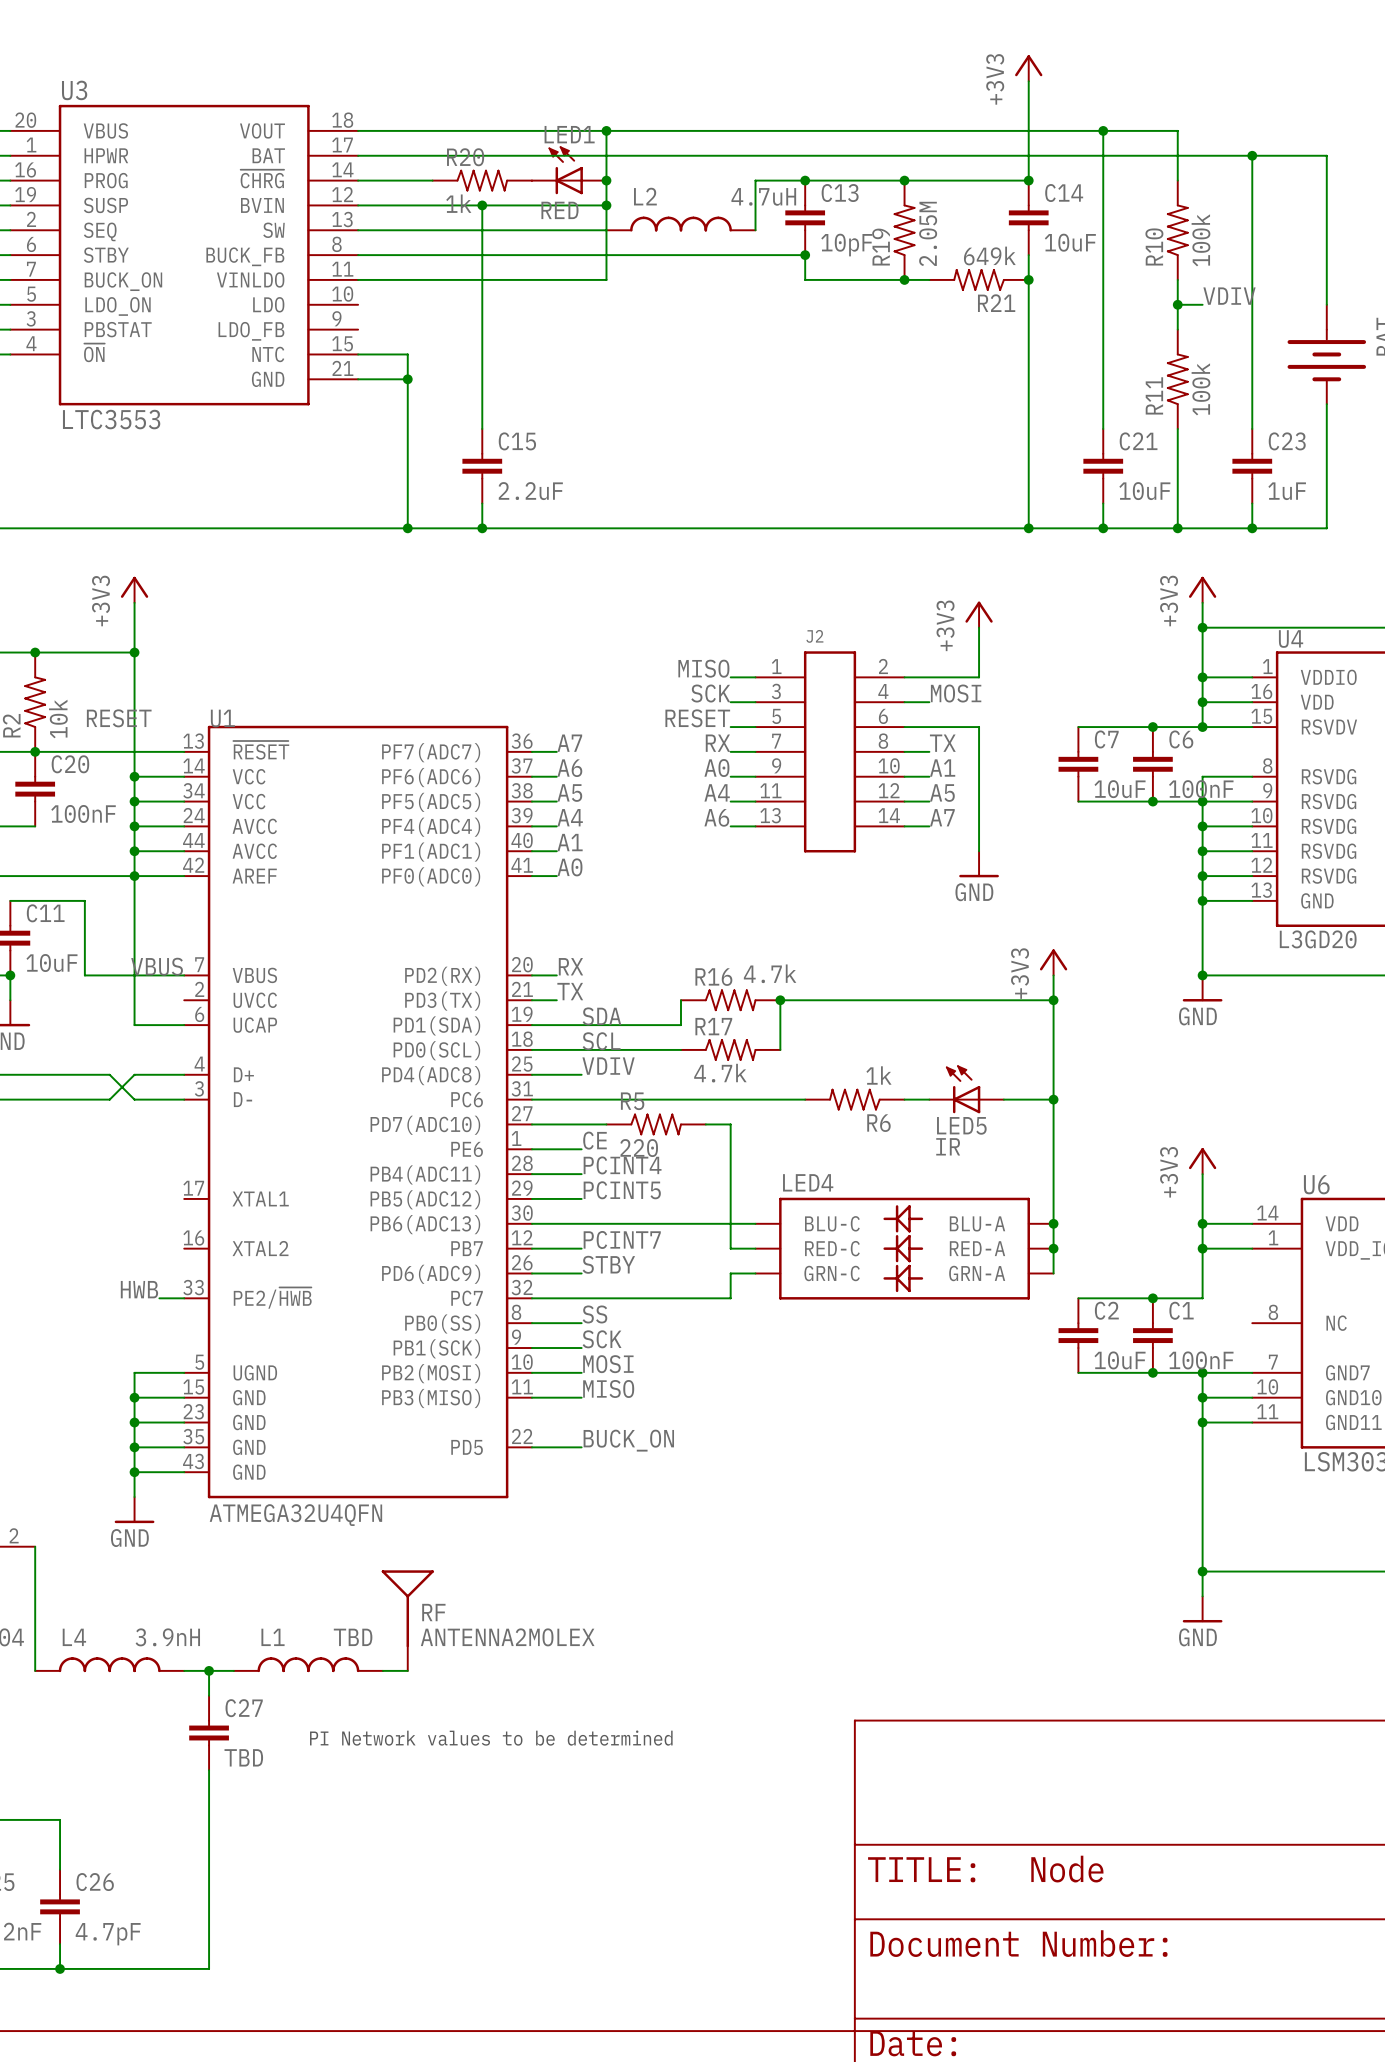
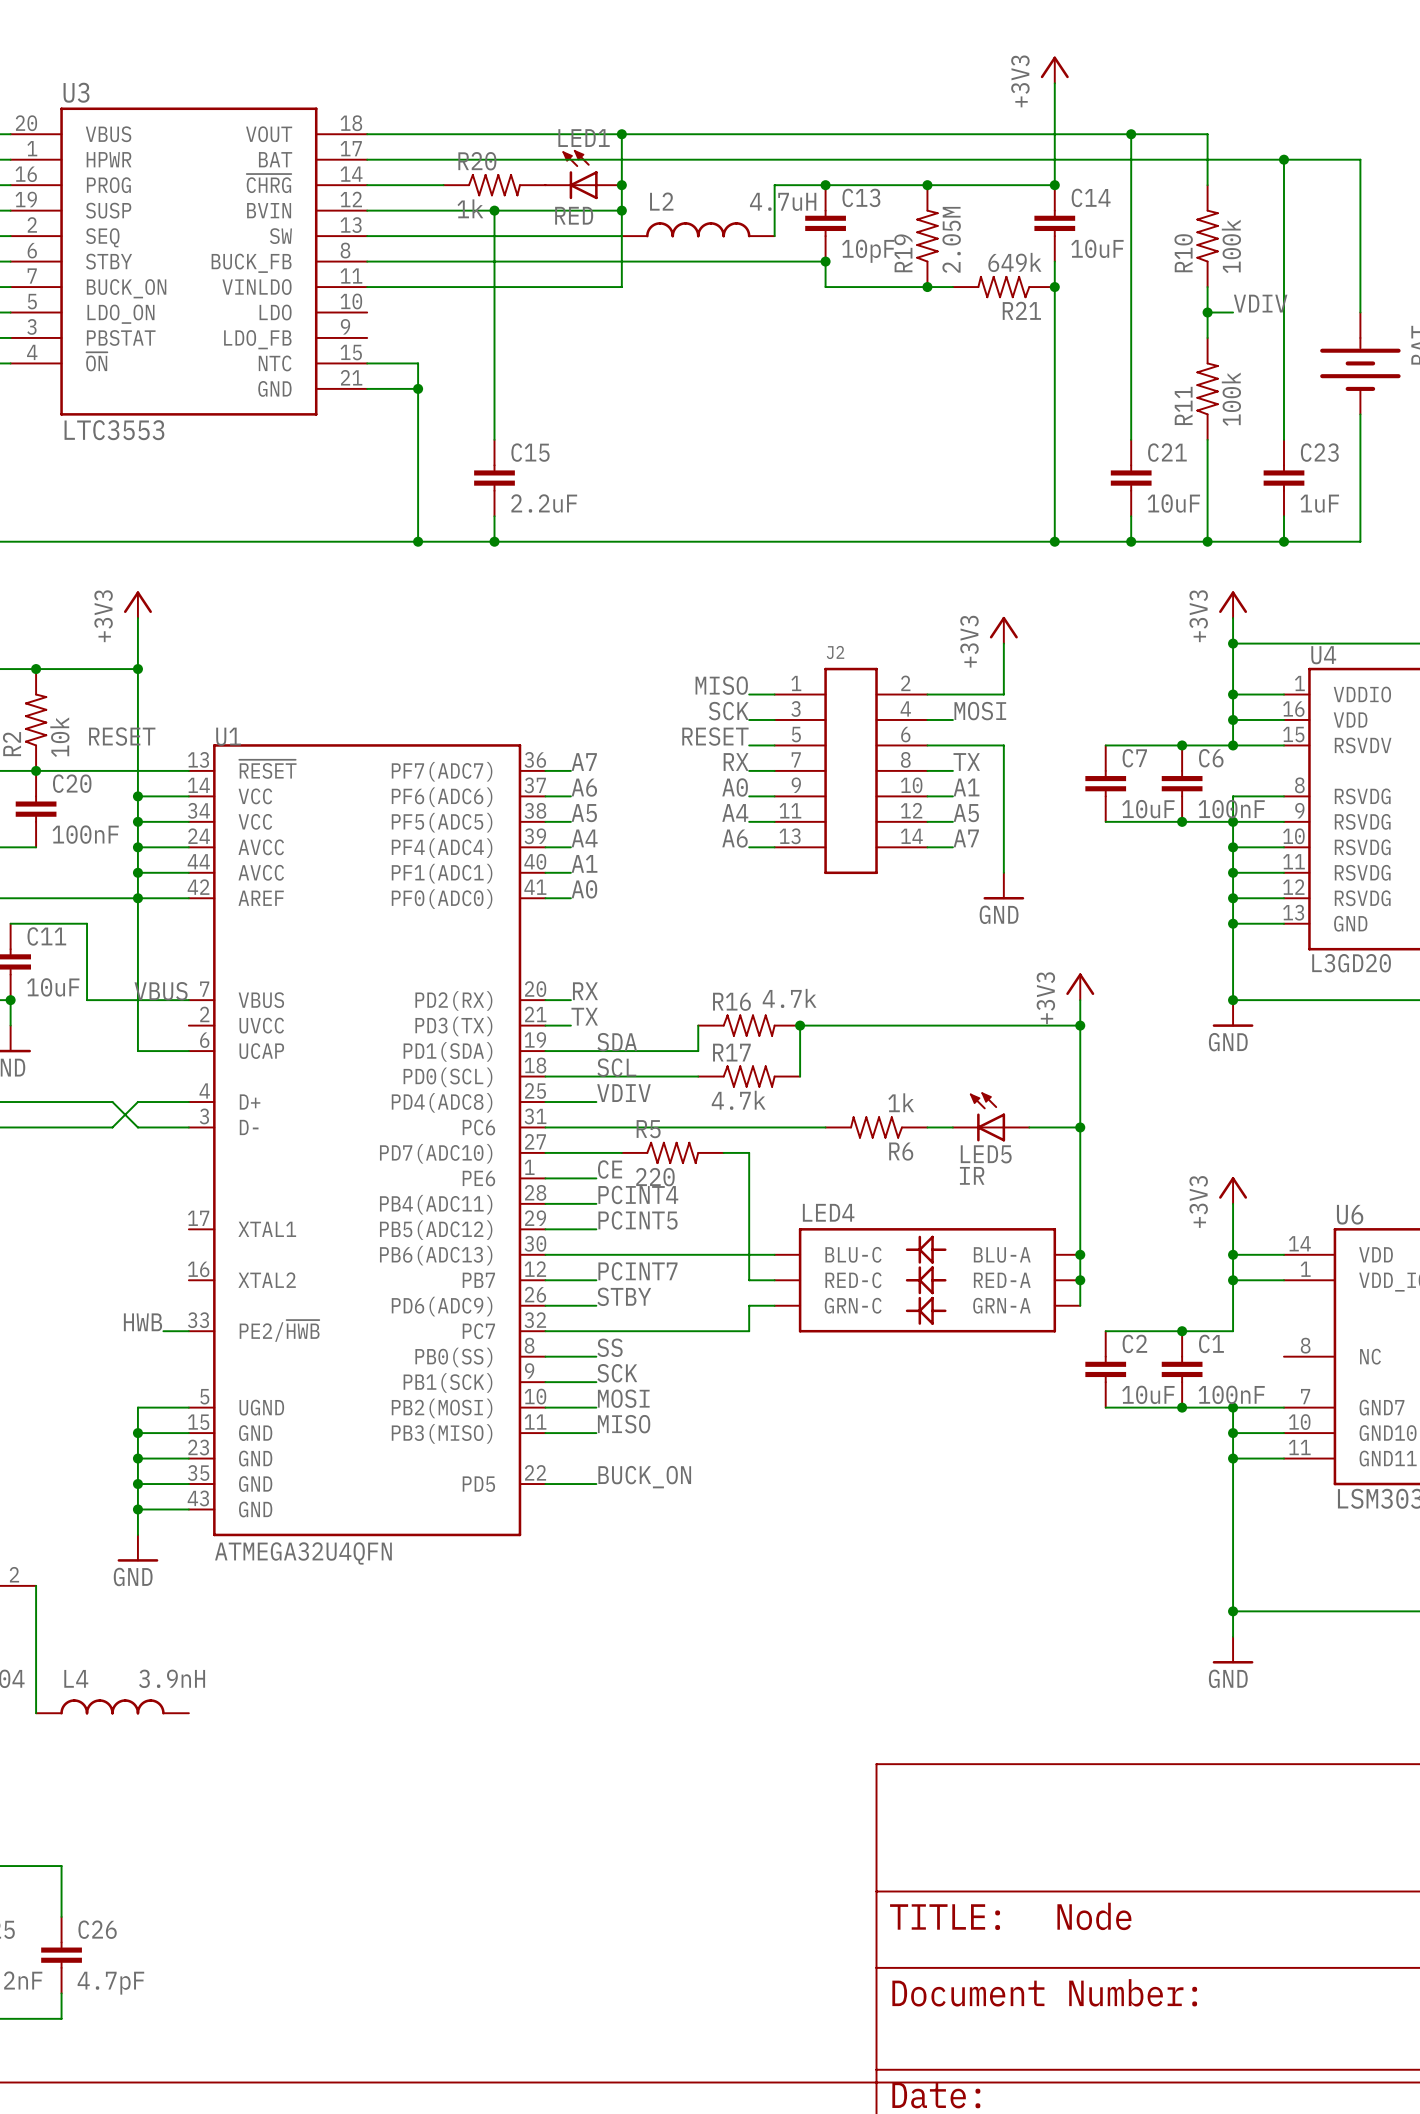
RF: ANTENNA2MOLEX (407, 1620) -> none
L1: TBD (308, 1664) -> none
wire: (184, 1670) (233, 1670) -> none
wire: (209, 1670) (209, 1695) -> none
junction: (209, 1670) -> none
wire: (382, 1670) (407, 1670) -> none
C27: TBD (209, 1733) -> none
text: PI Network values to be determined (491, 1738) -> none
wire: (209, 1770) (209, 1968) (60, 1968) -> none
junction: (60, 1968) -> none

